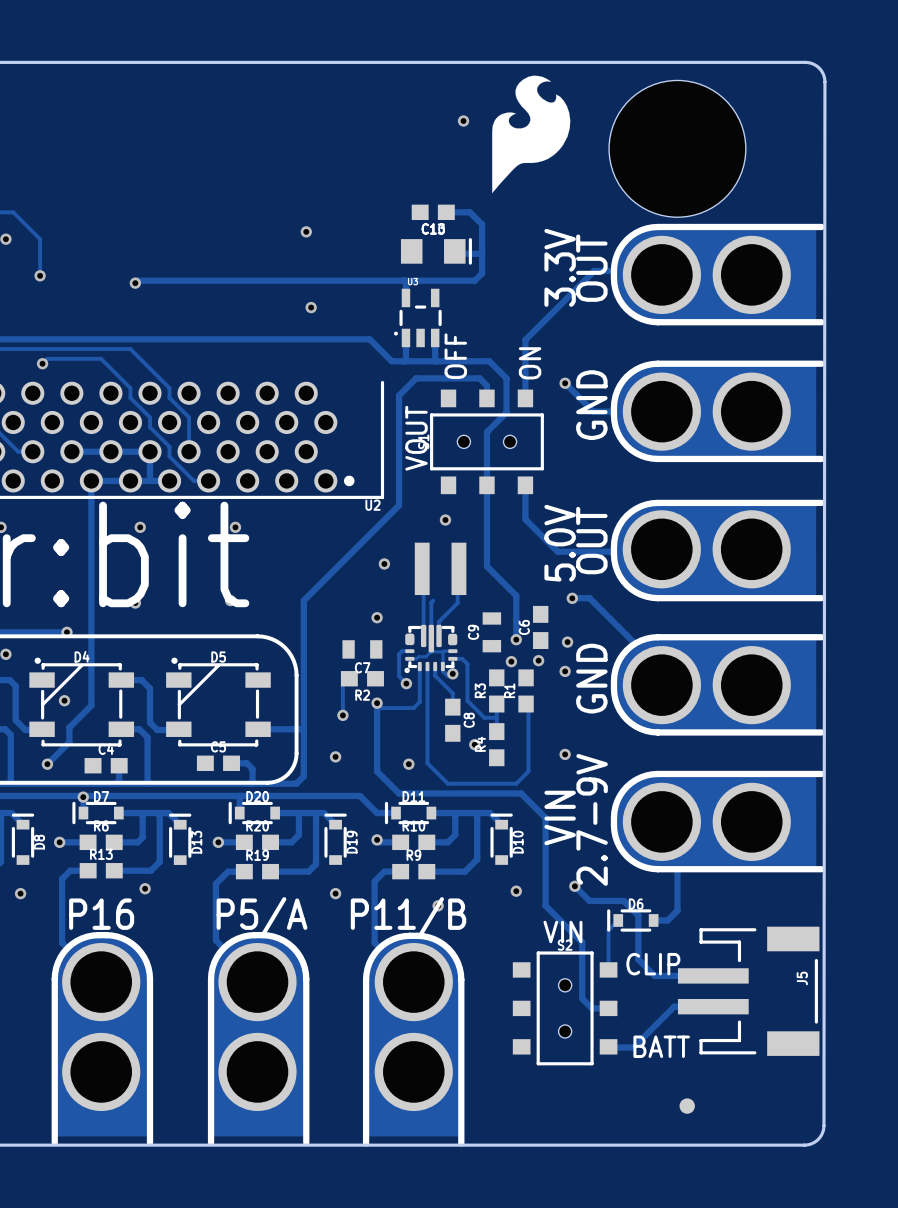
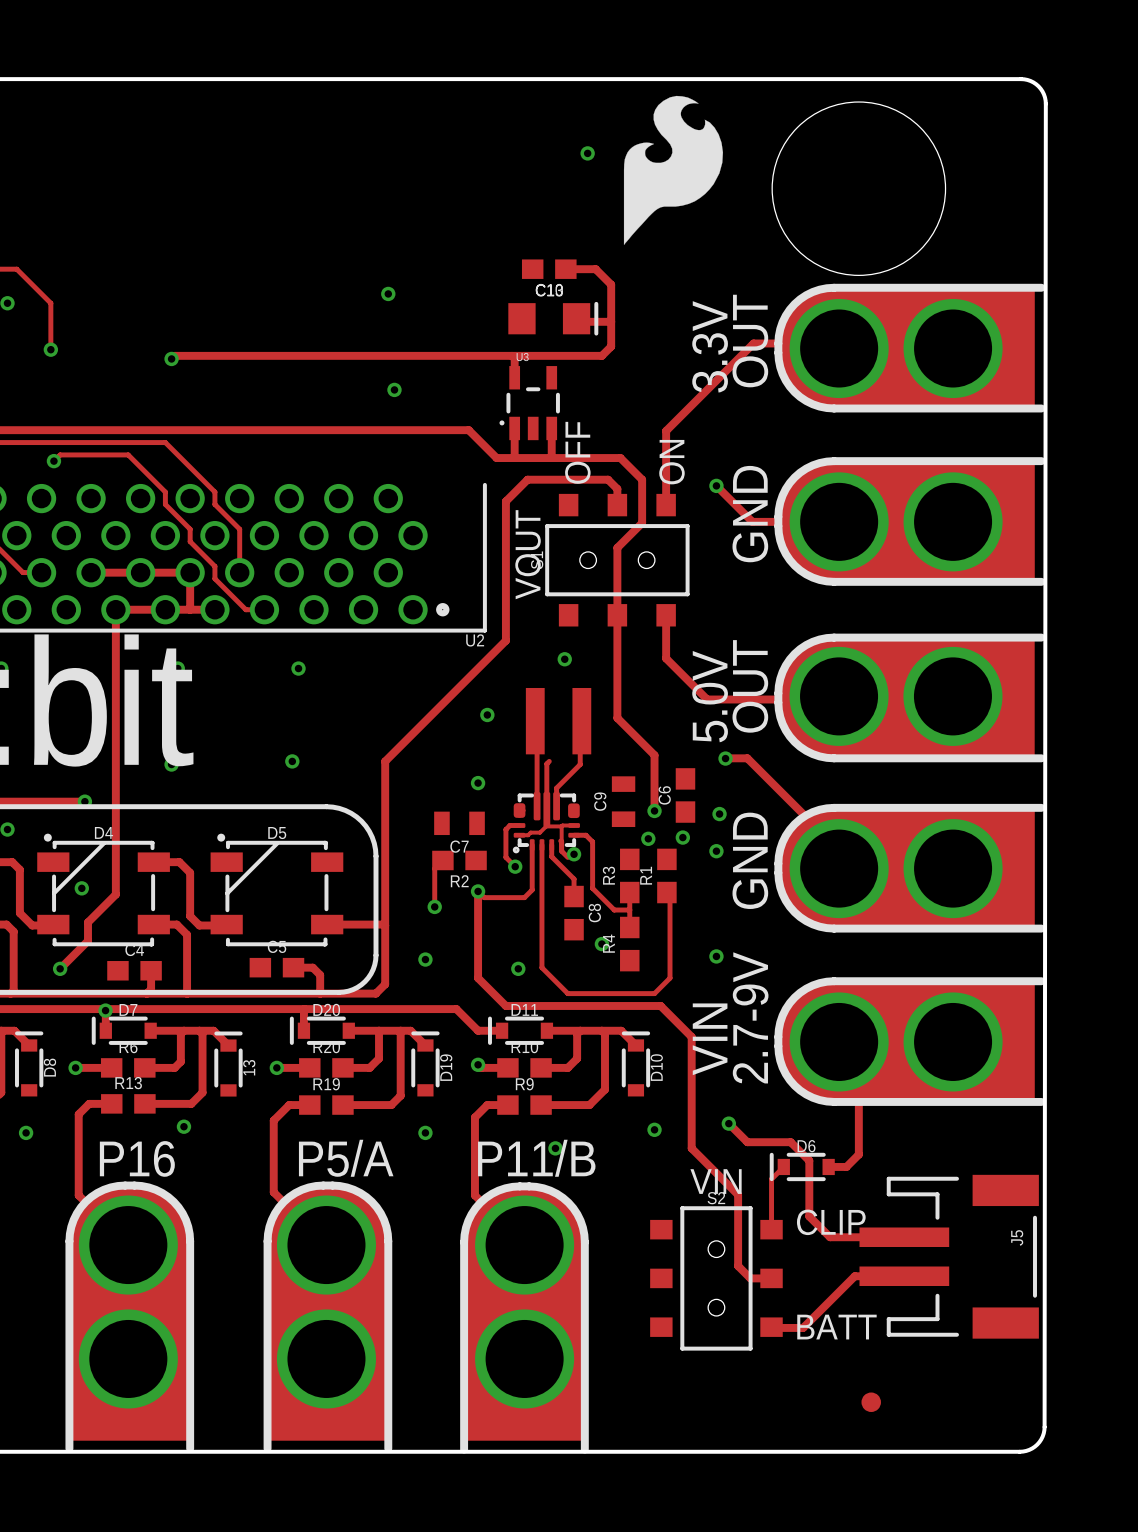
D13 name: D13 (196, 842) -> 13 (249, 1067)

